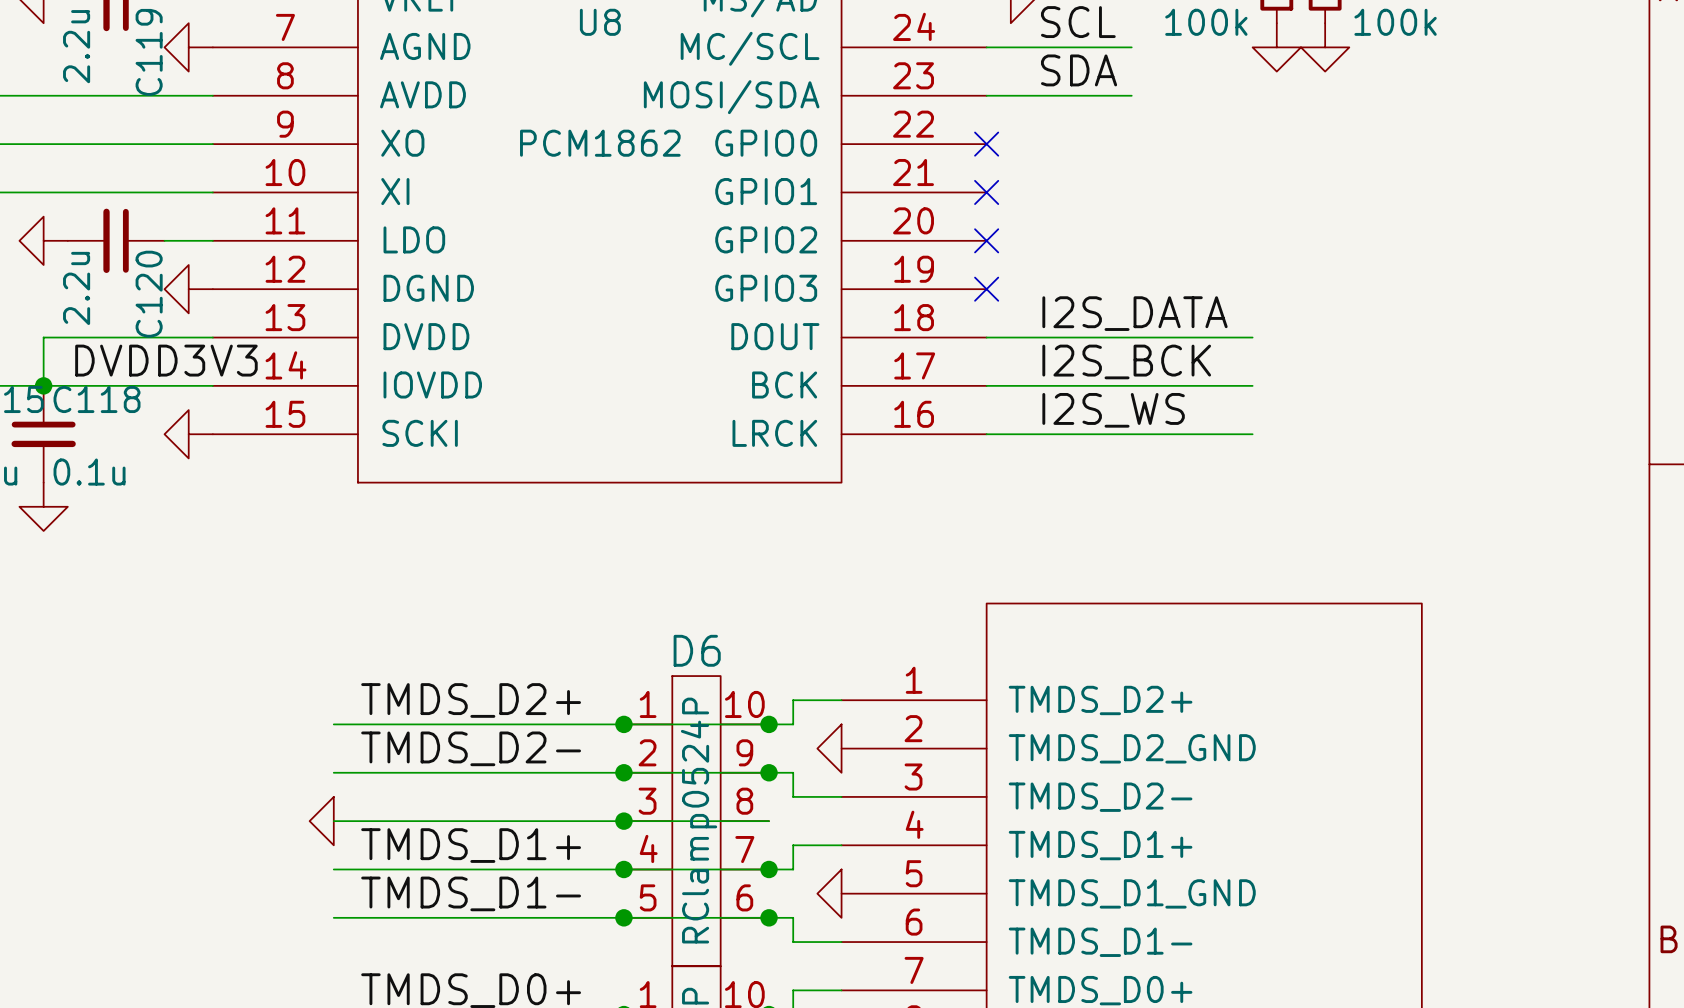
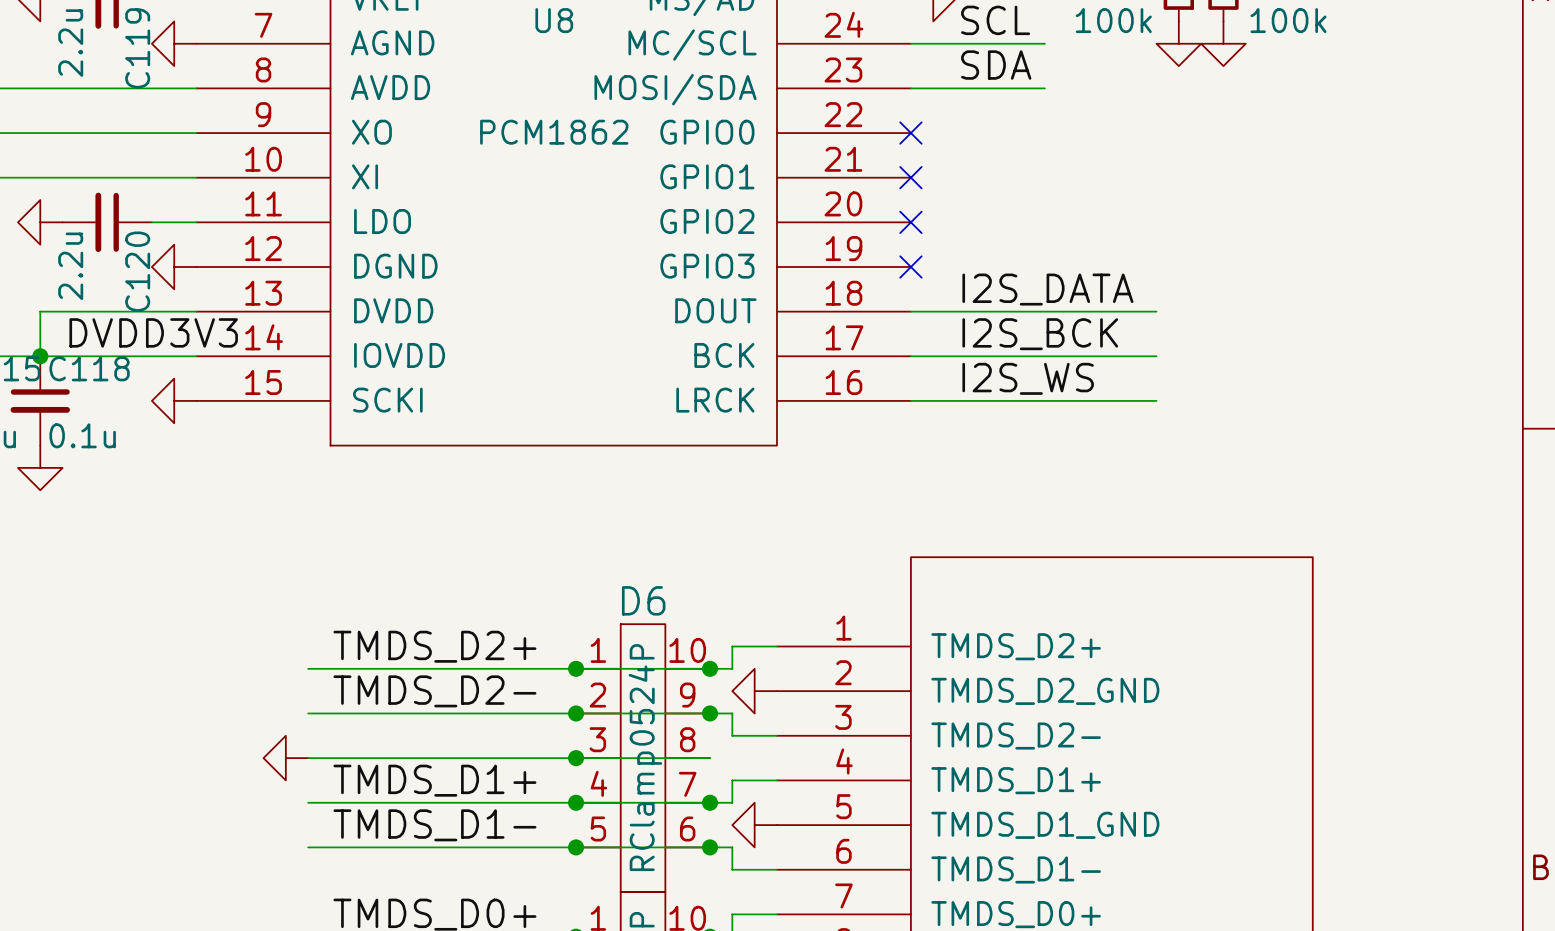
power symbol shape: [817, 724, 842, 773] -> [732, 668, 777, 714]
power symbol shape: [309, 796, 334, 846] -> [263, 735, 309, 781]
power symbol shape: [817, 869, 842, 918] -> [732, 802, 777, 848]

